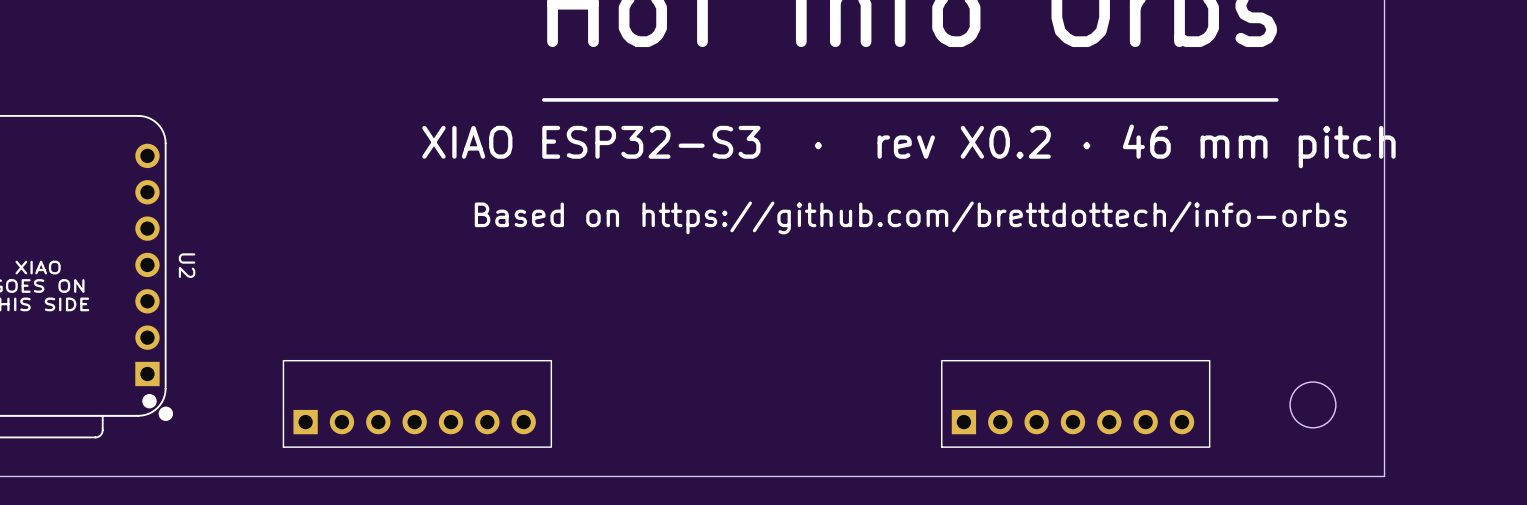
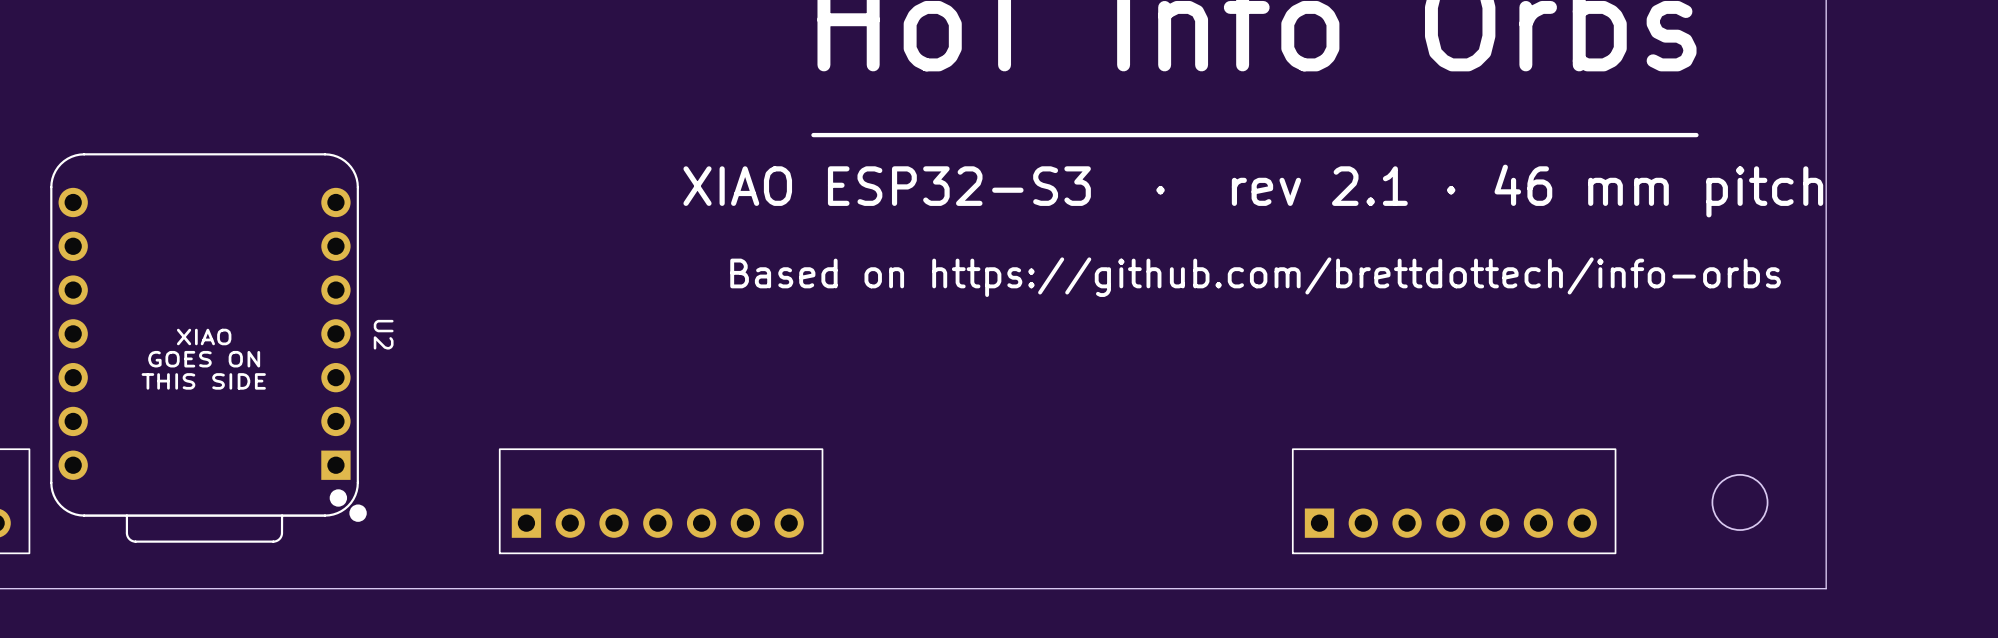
text: XIAO ESP32-S3 · rev X0.2 · 46 mm pitch (908, 146) -> XIAO ESP32-S3 · rev 2.1 · 46 mm pitch (1253, 191)

